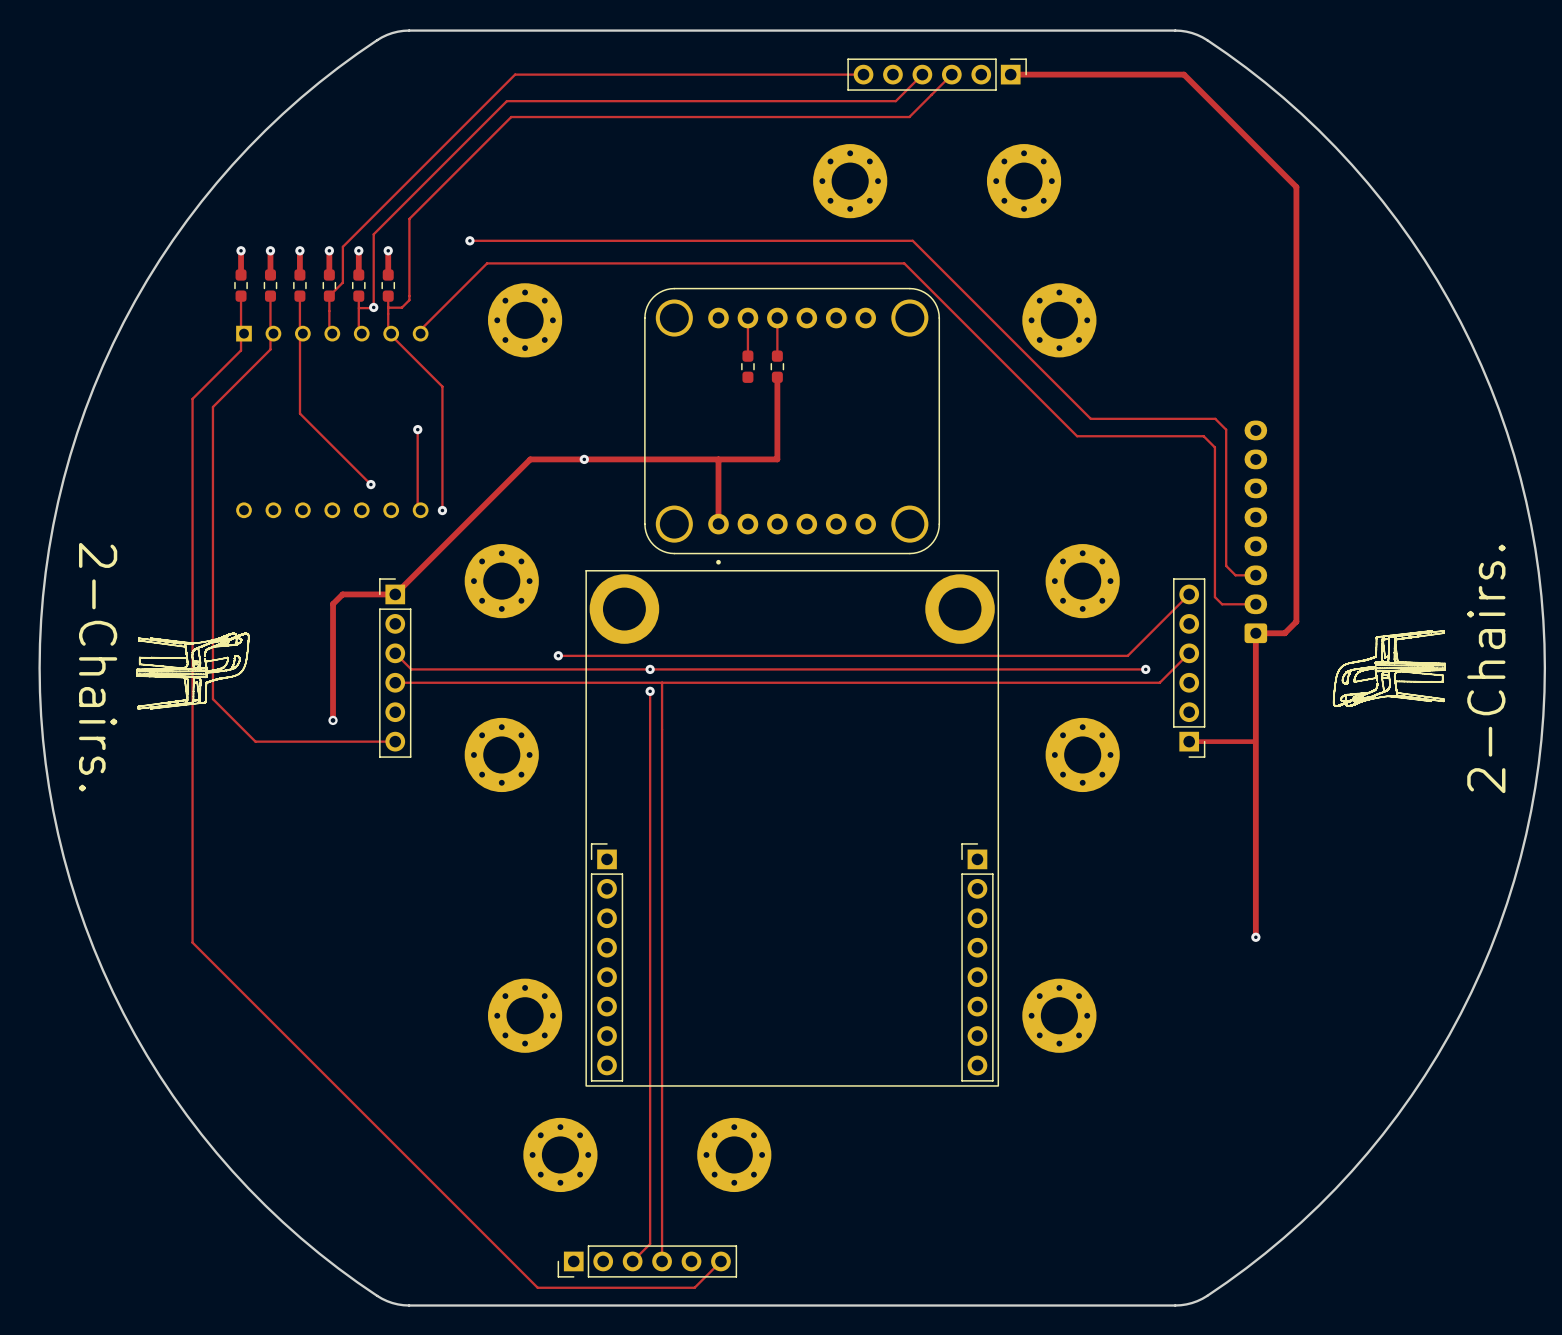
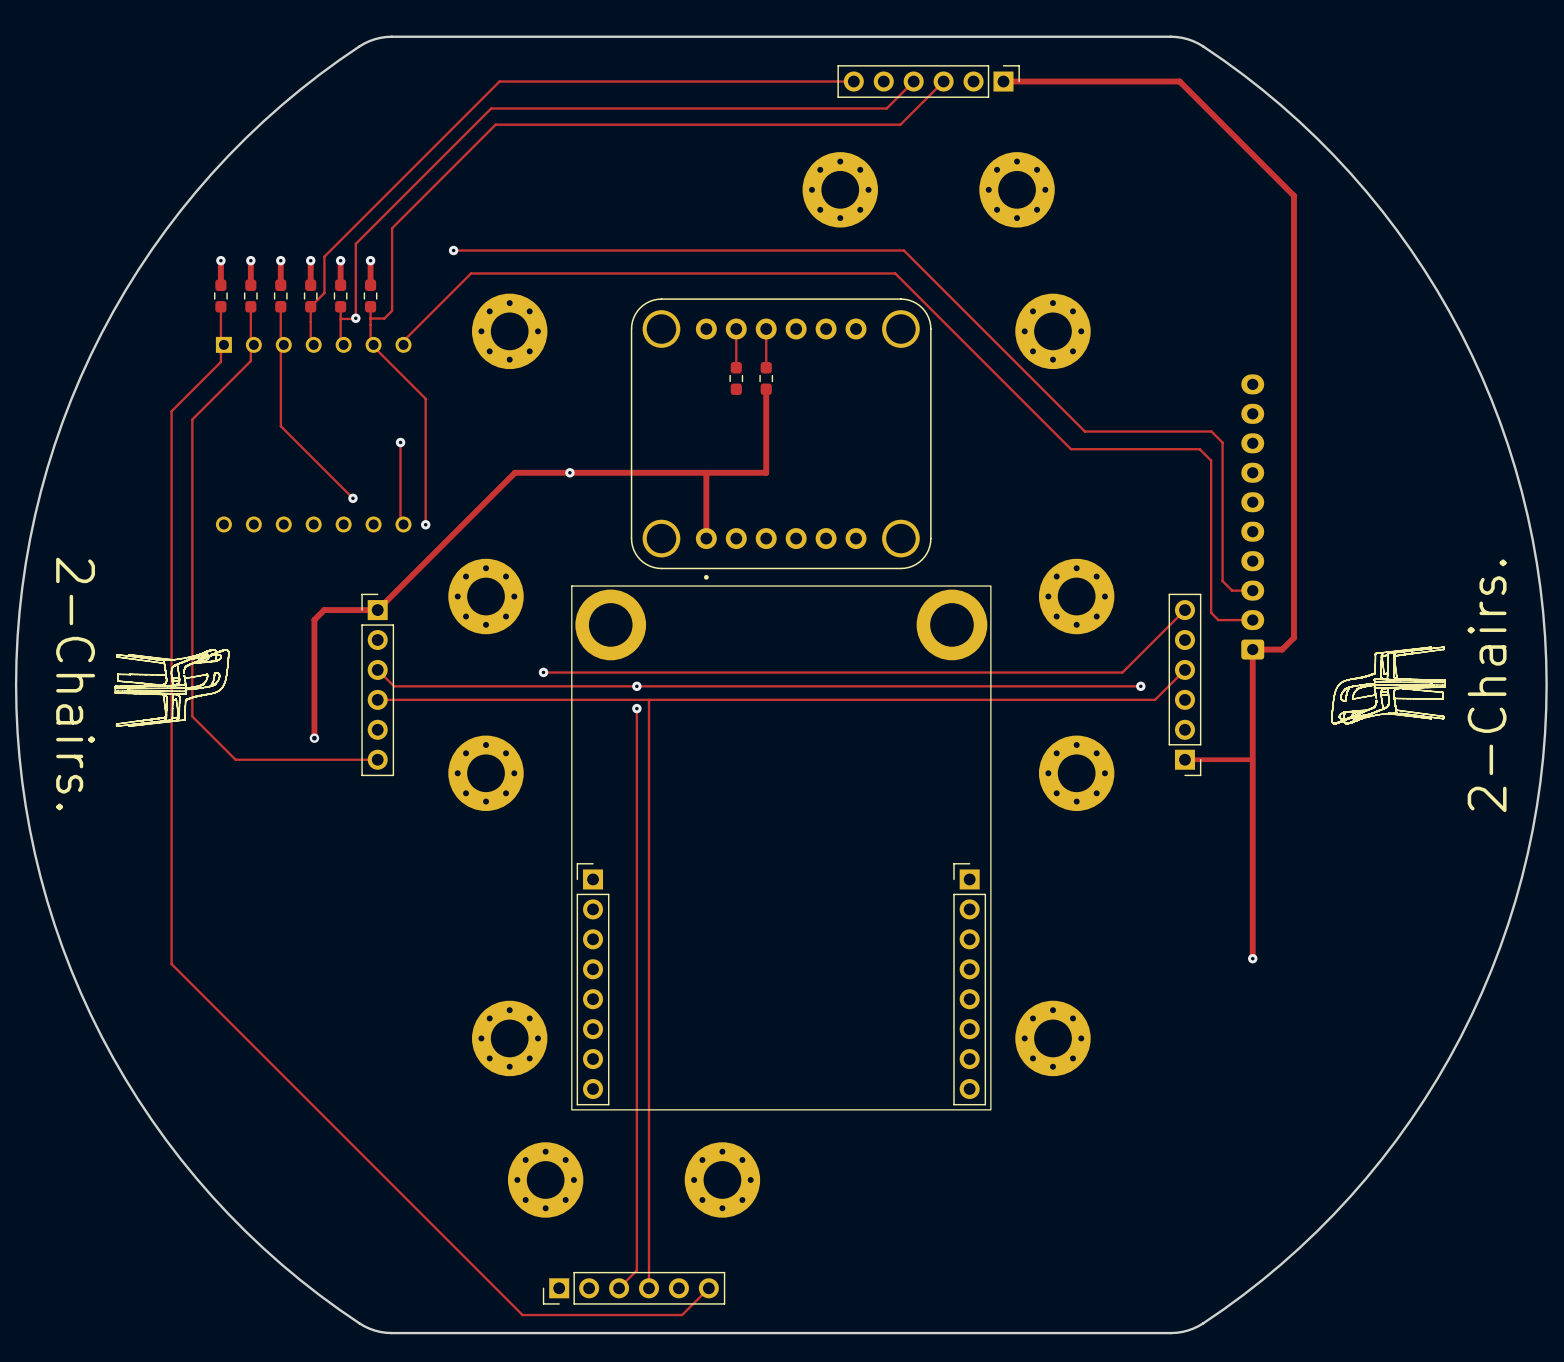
part: none -> (1252, 516)

